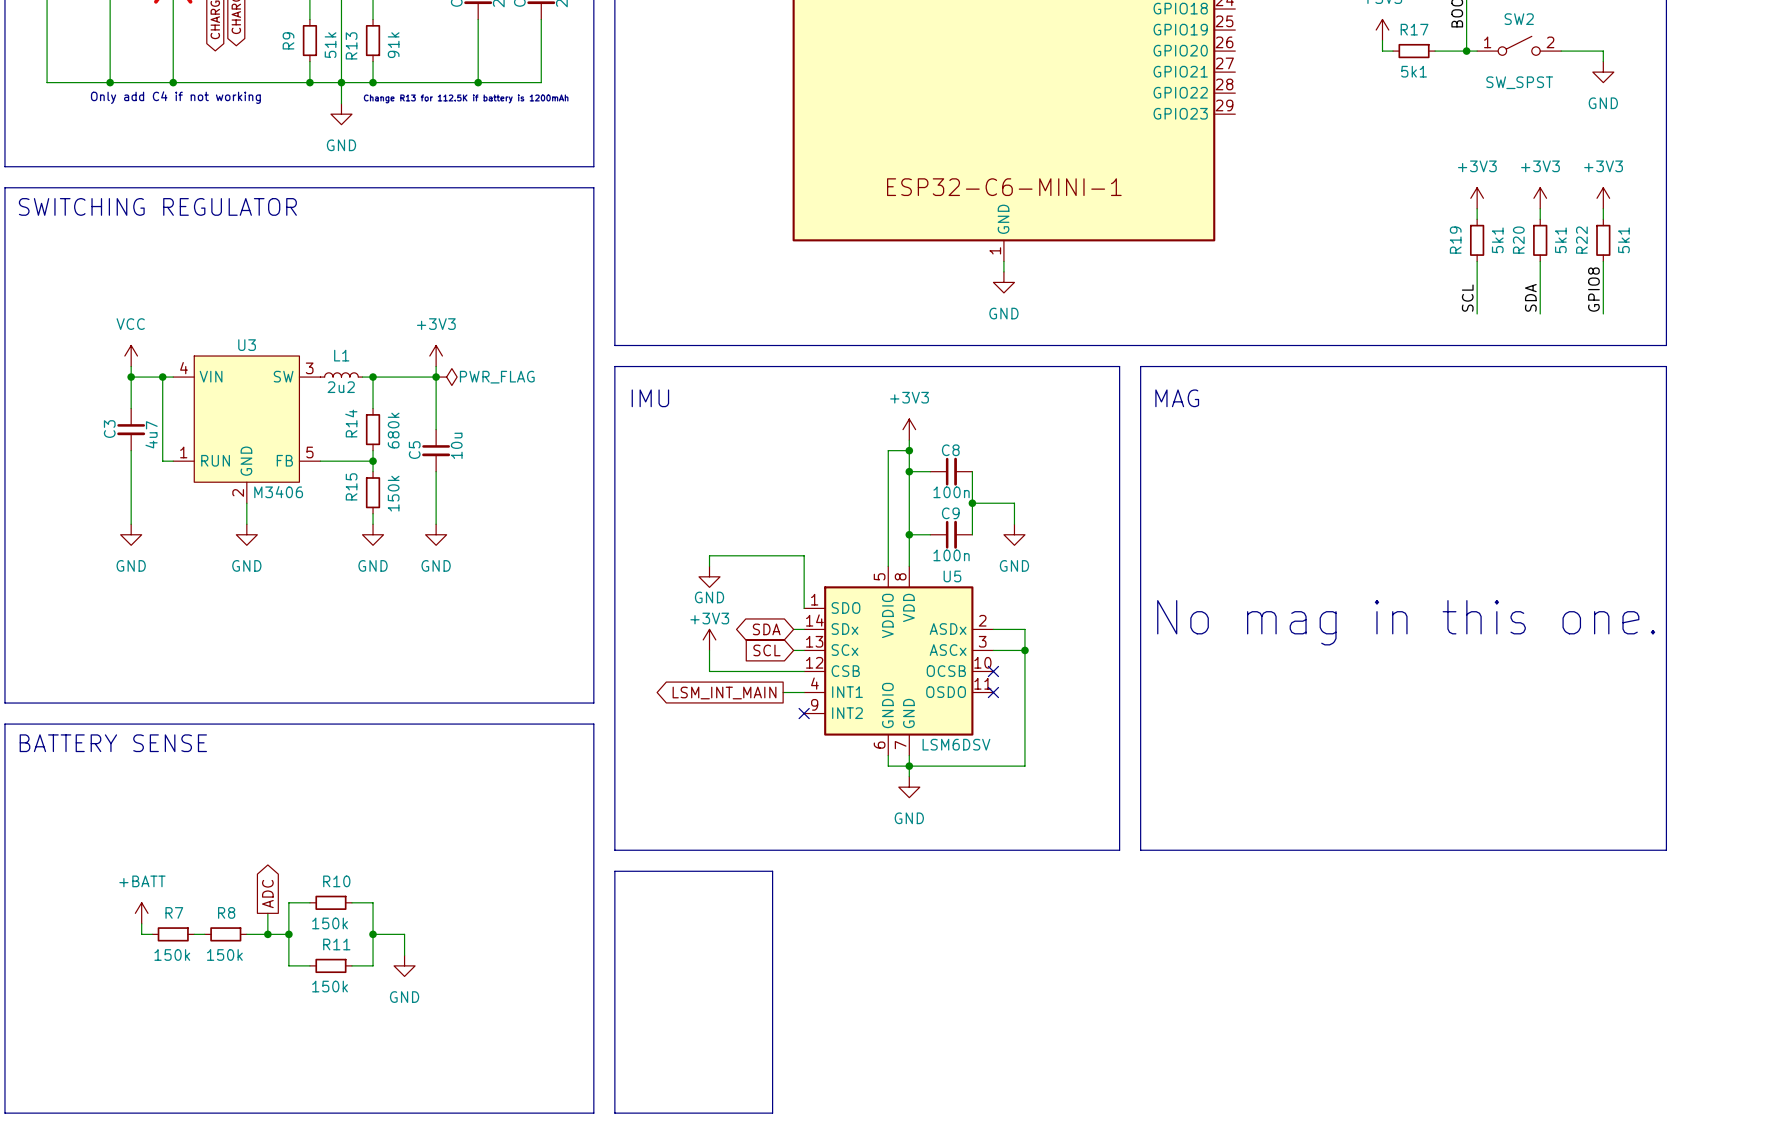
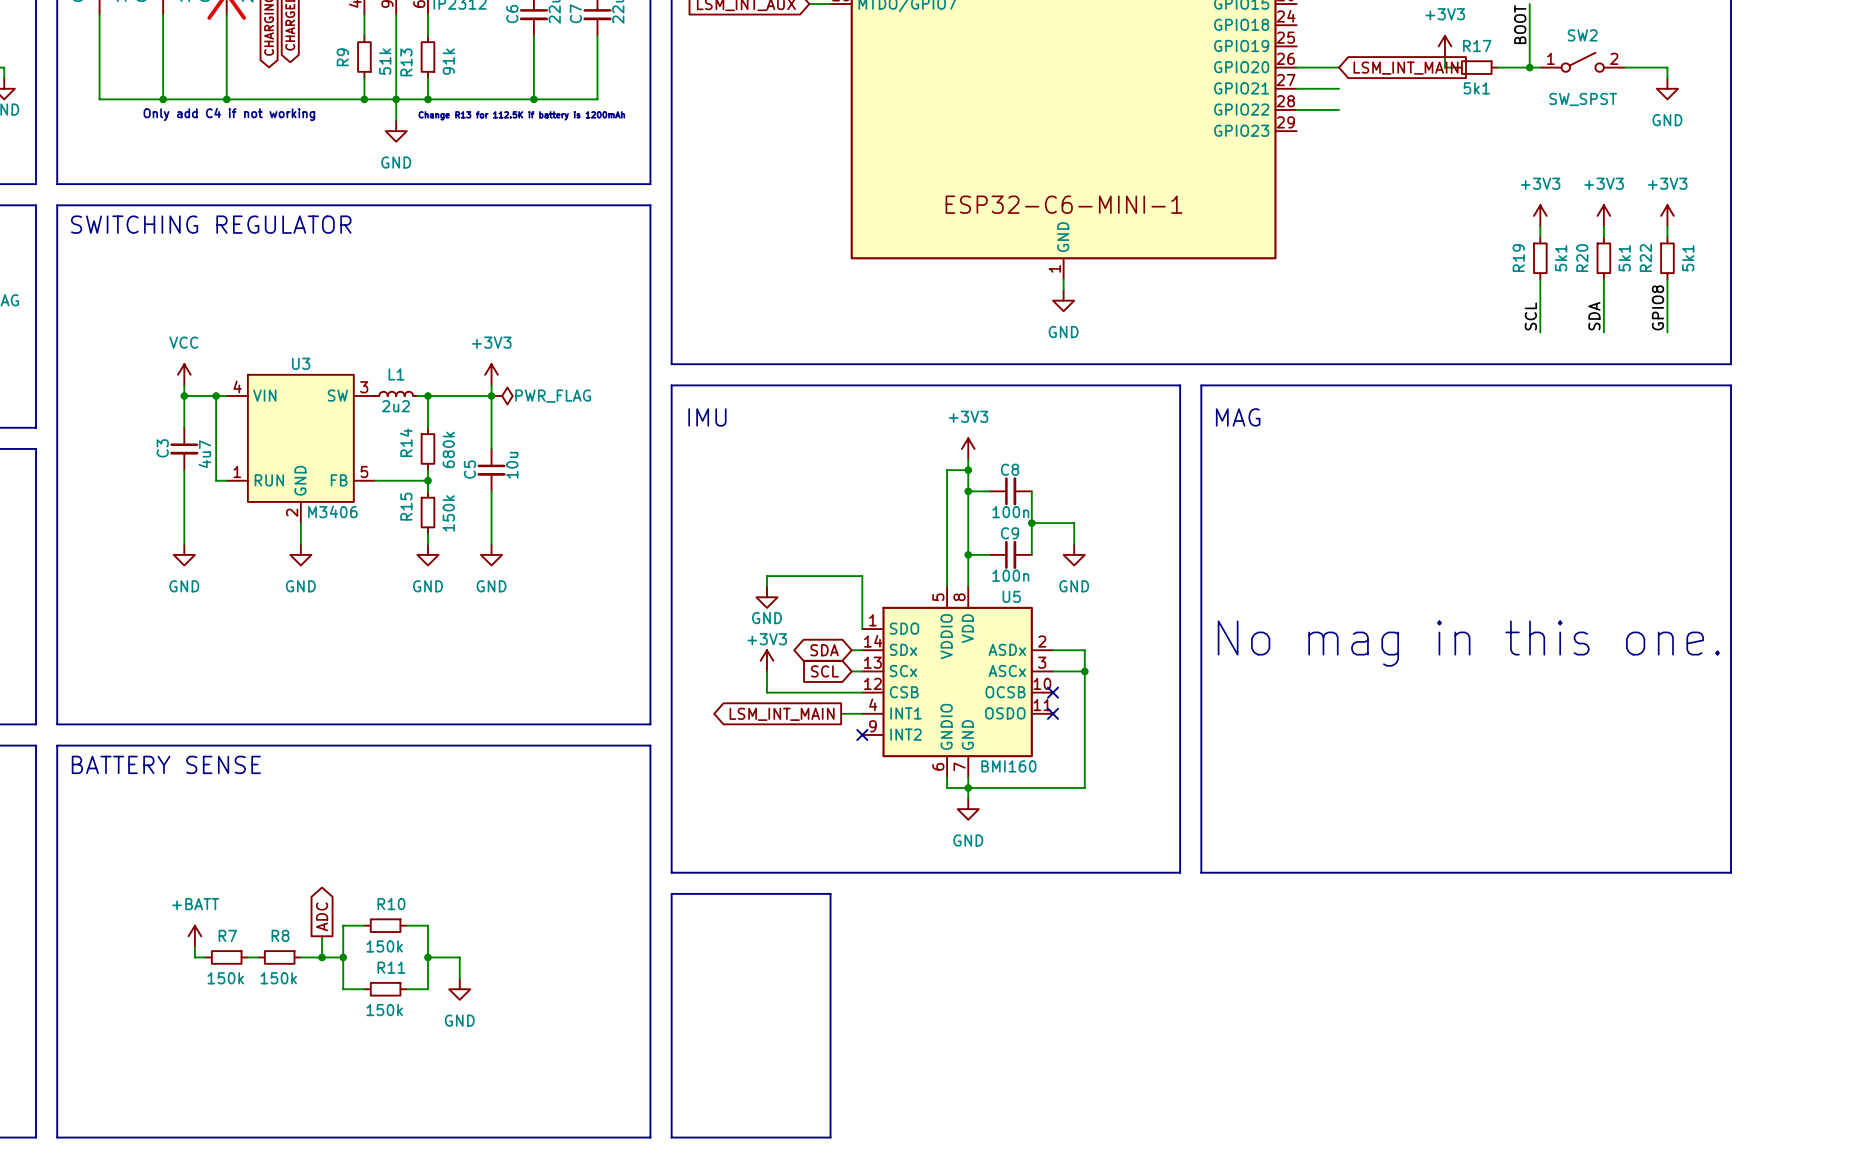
wire: none -> (1296, 67) (1339, 67)
global label: none -> LSM_INT_MAIN (1406, 68)
wire: none -> (1296, 88) (1339, 88)
wire: none -> (1296, 109) (1339, 109)
U5 value: LSM6DSV (956, 744) -> BMI160 (1008, 766)

